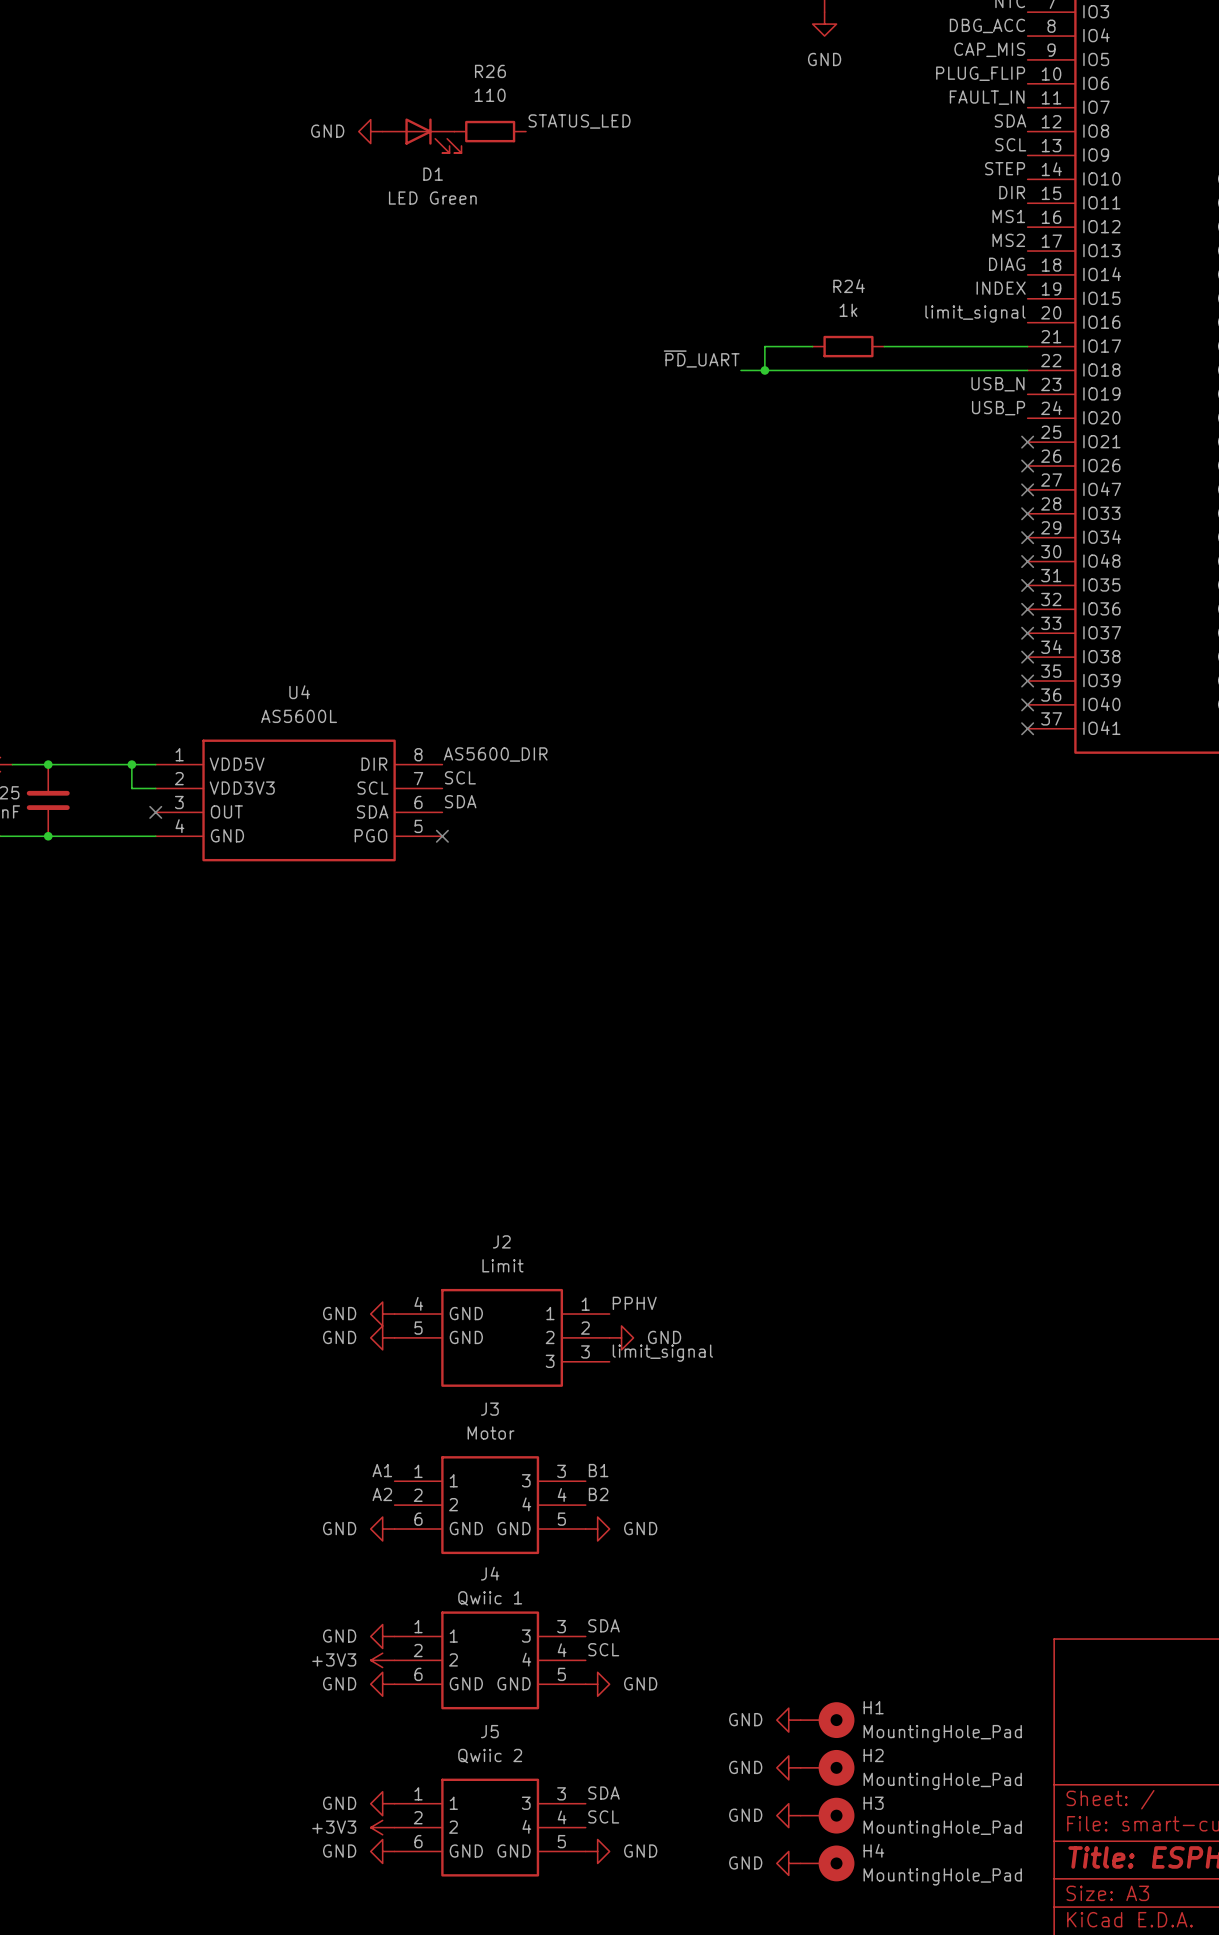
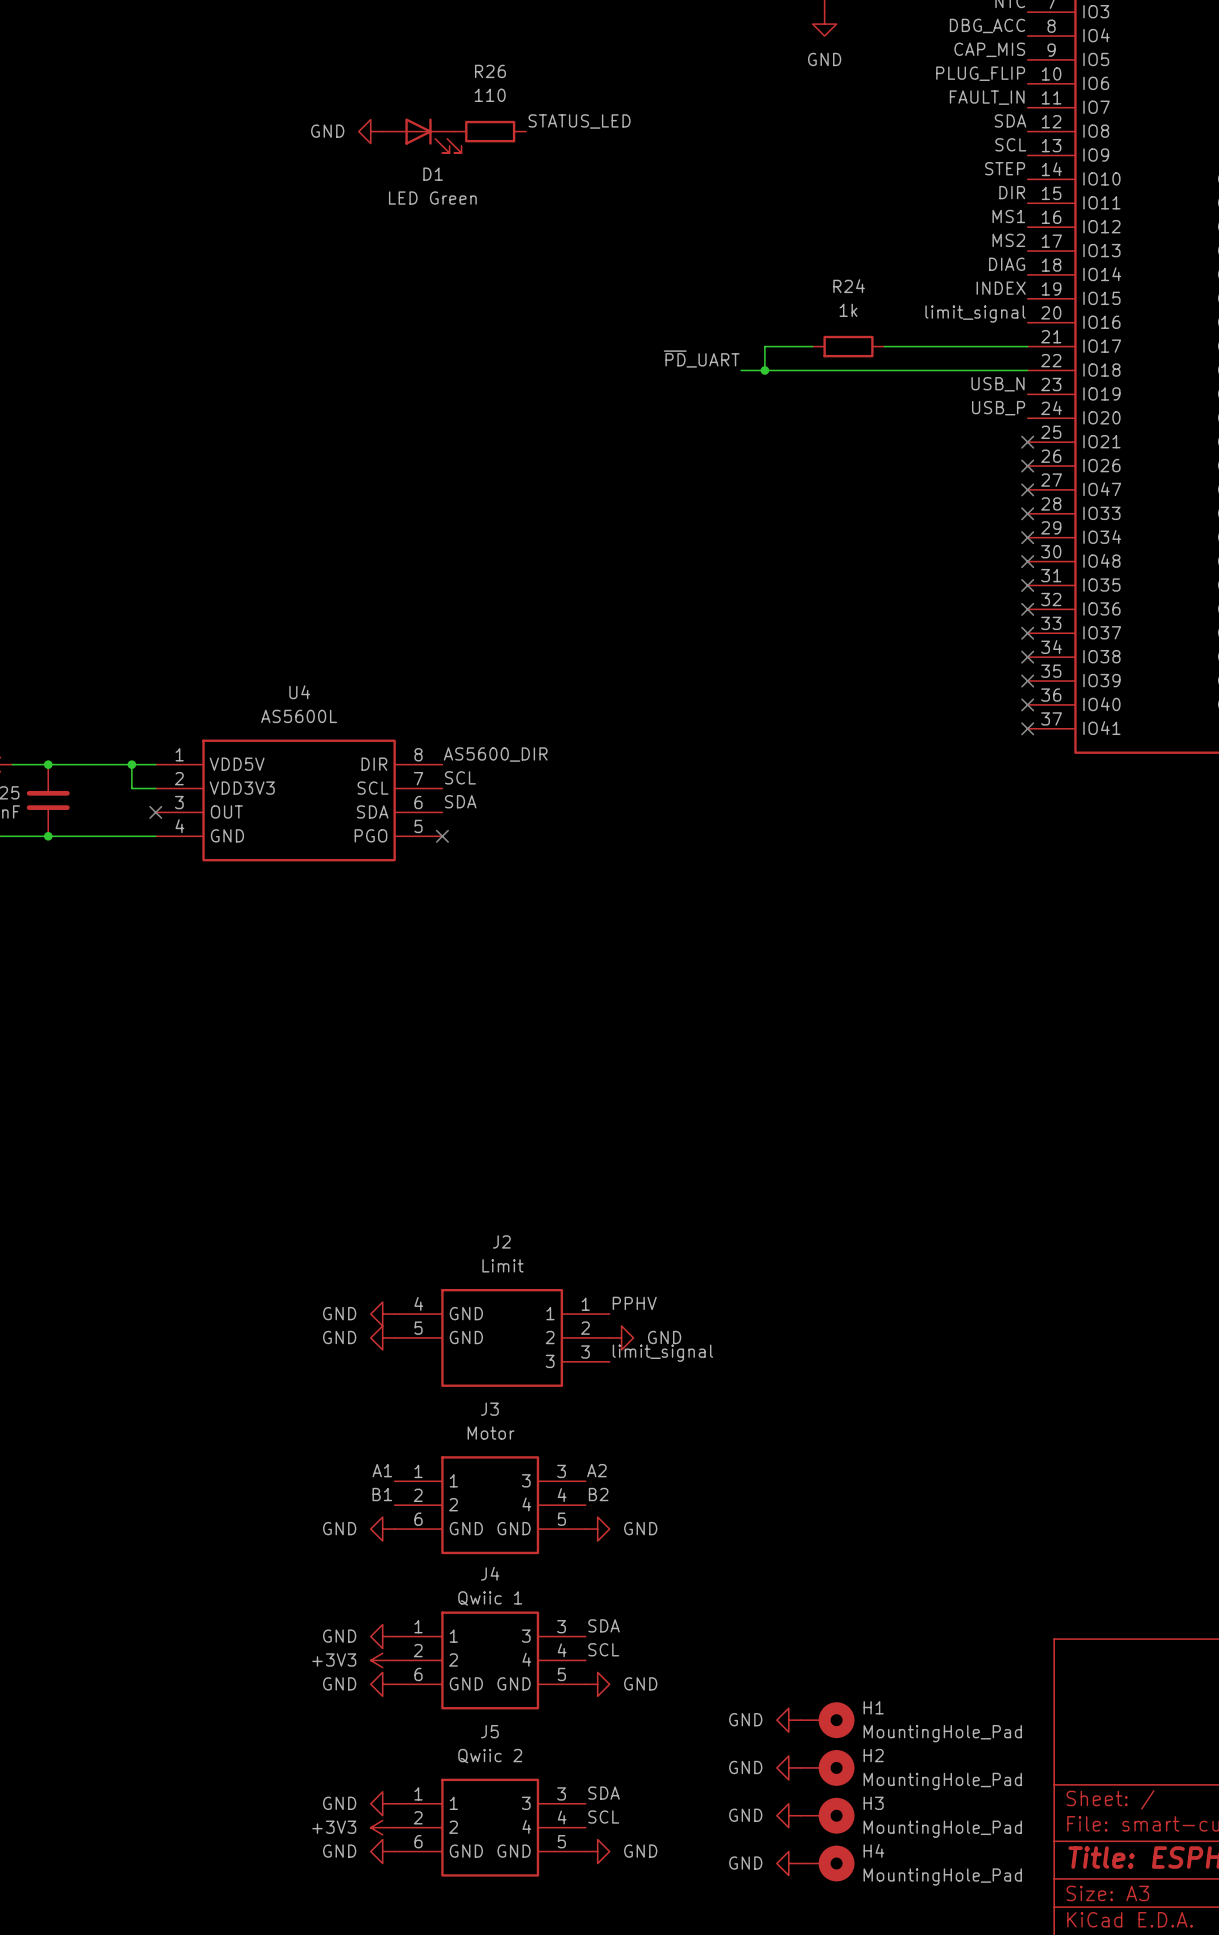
label: B1 (598, 1470) -> A2 (596, 1470)
label: A2 (382, 1494) -> B1 (382, 1494)

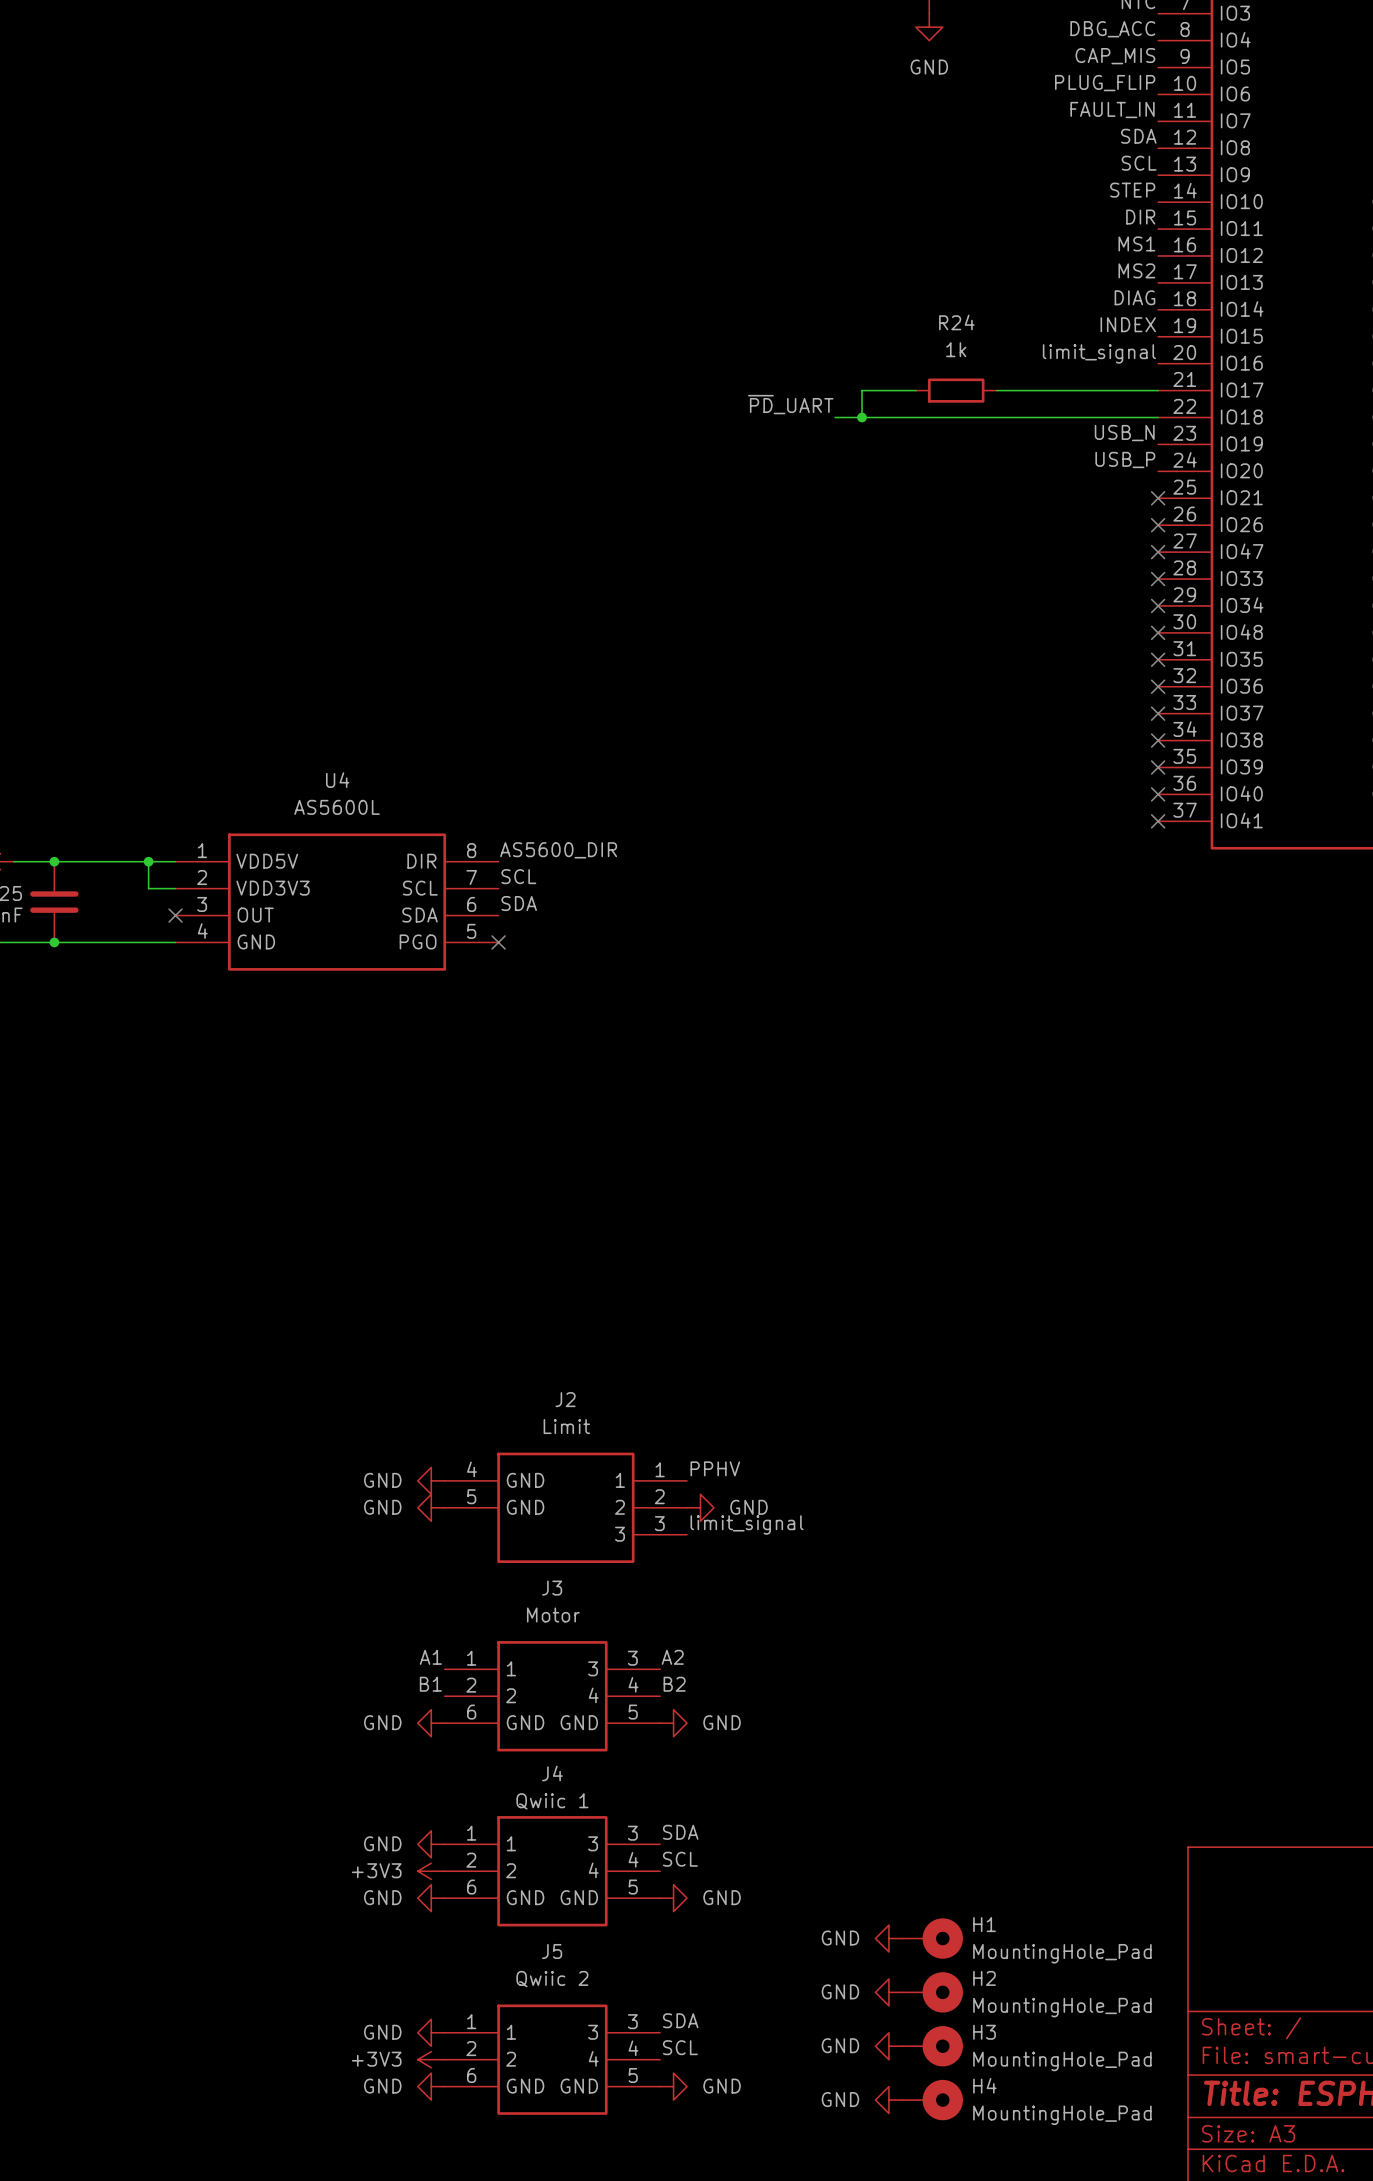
label: STATUS_LED (579, 121) -> none
power symbol: GND (370, 131) -> none
R26: 110 (490, 131) -> none
D1: LED Green (422, 135) -> none

